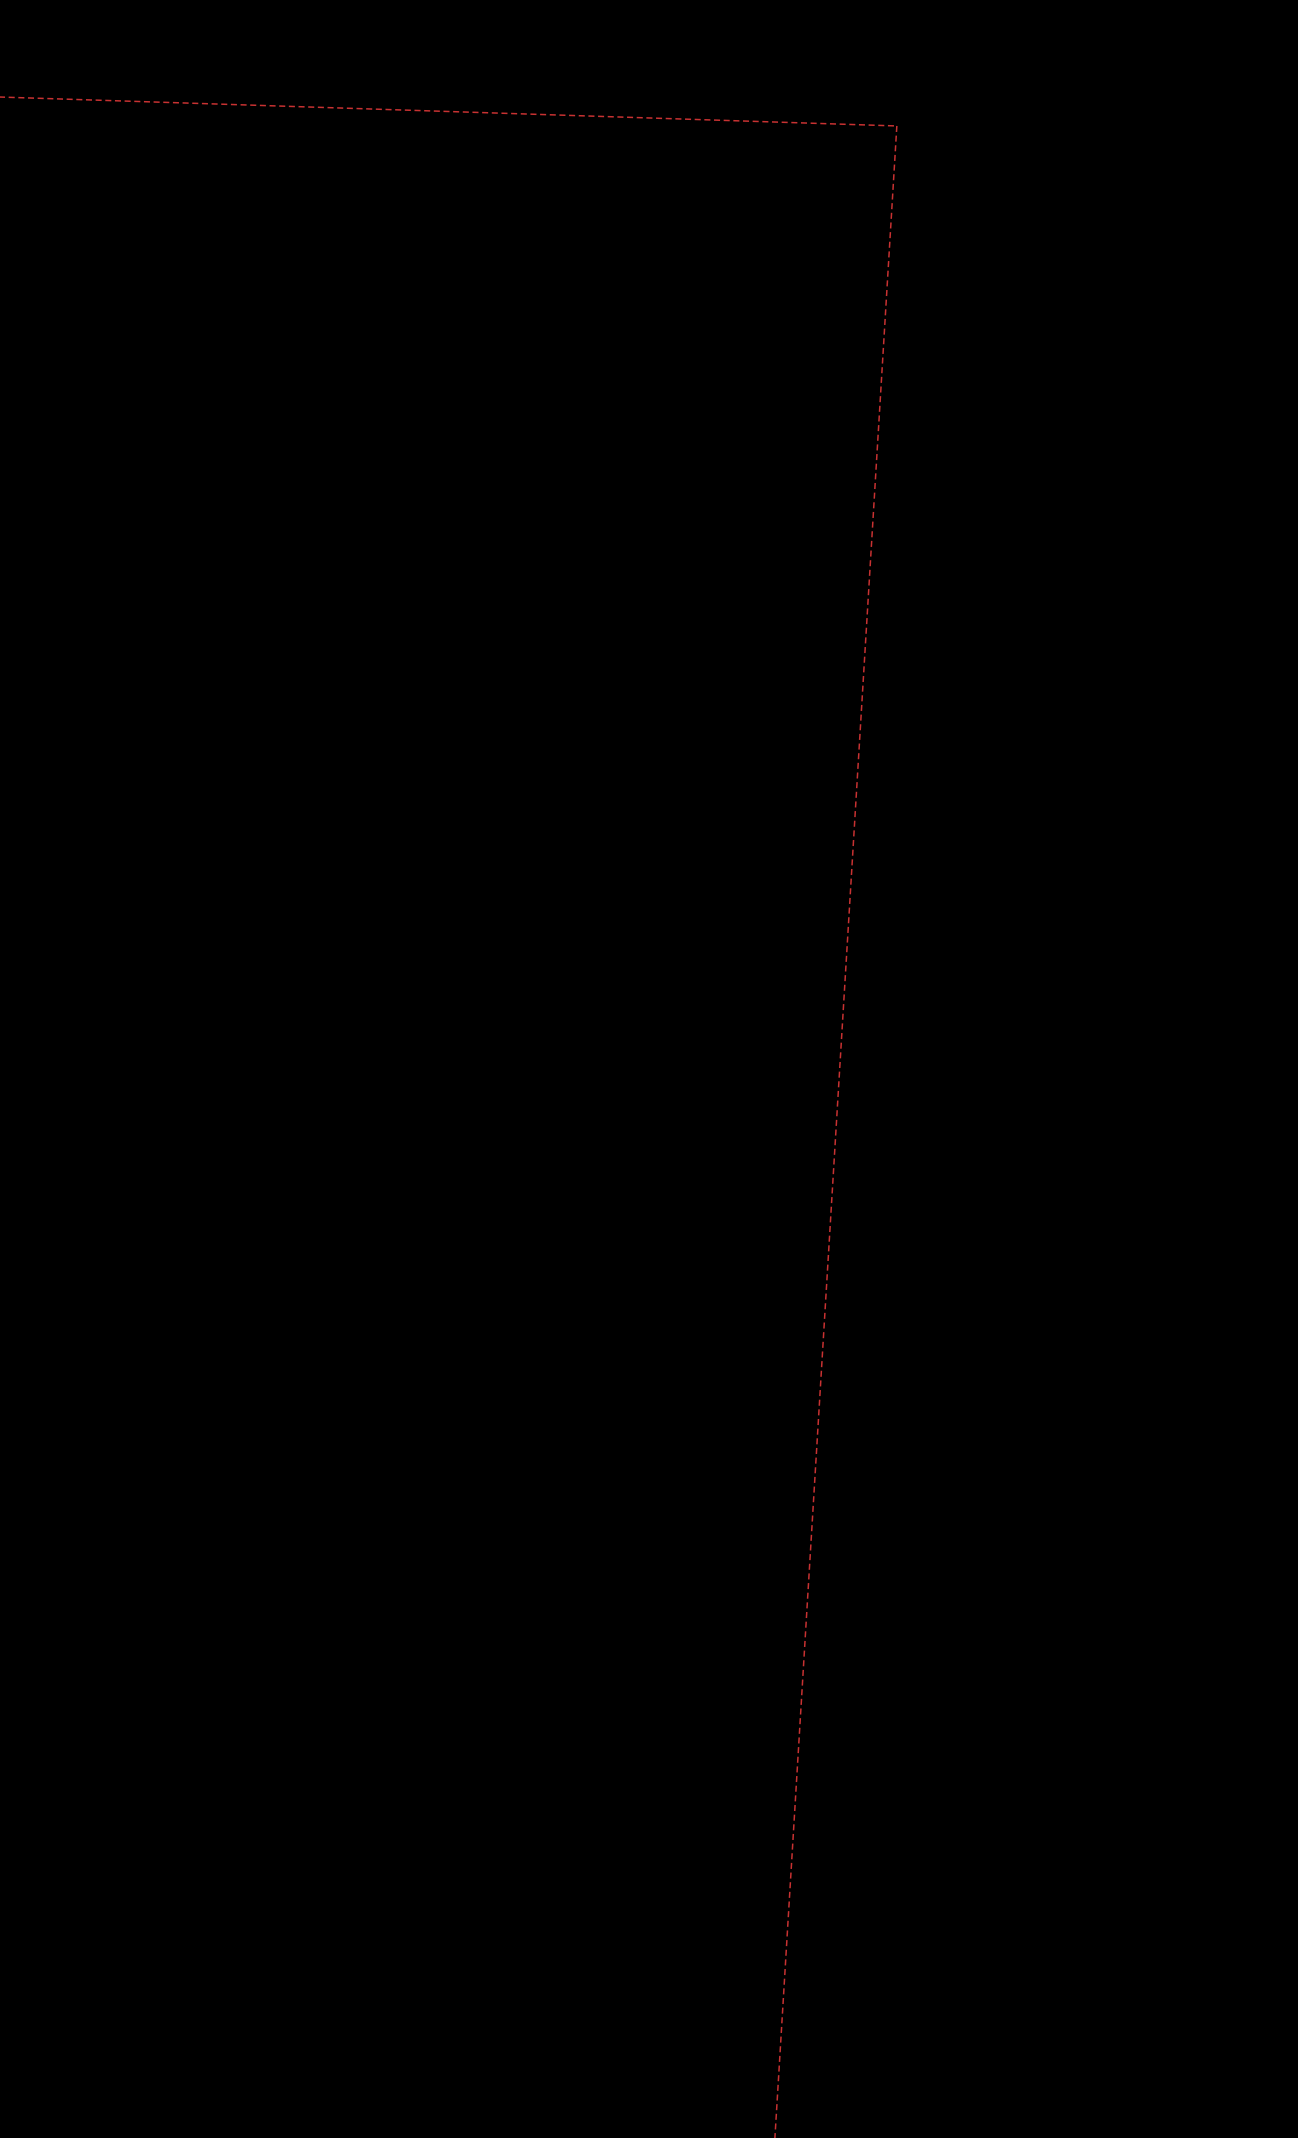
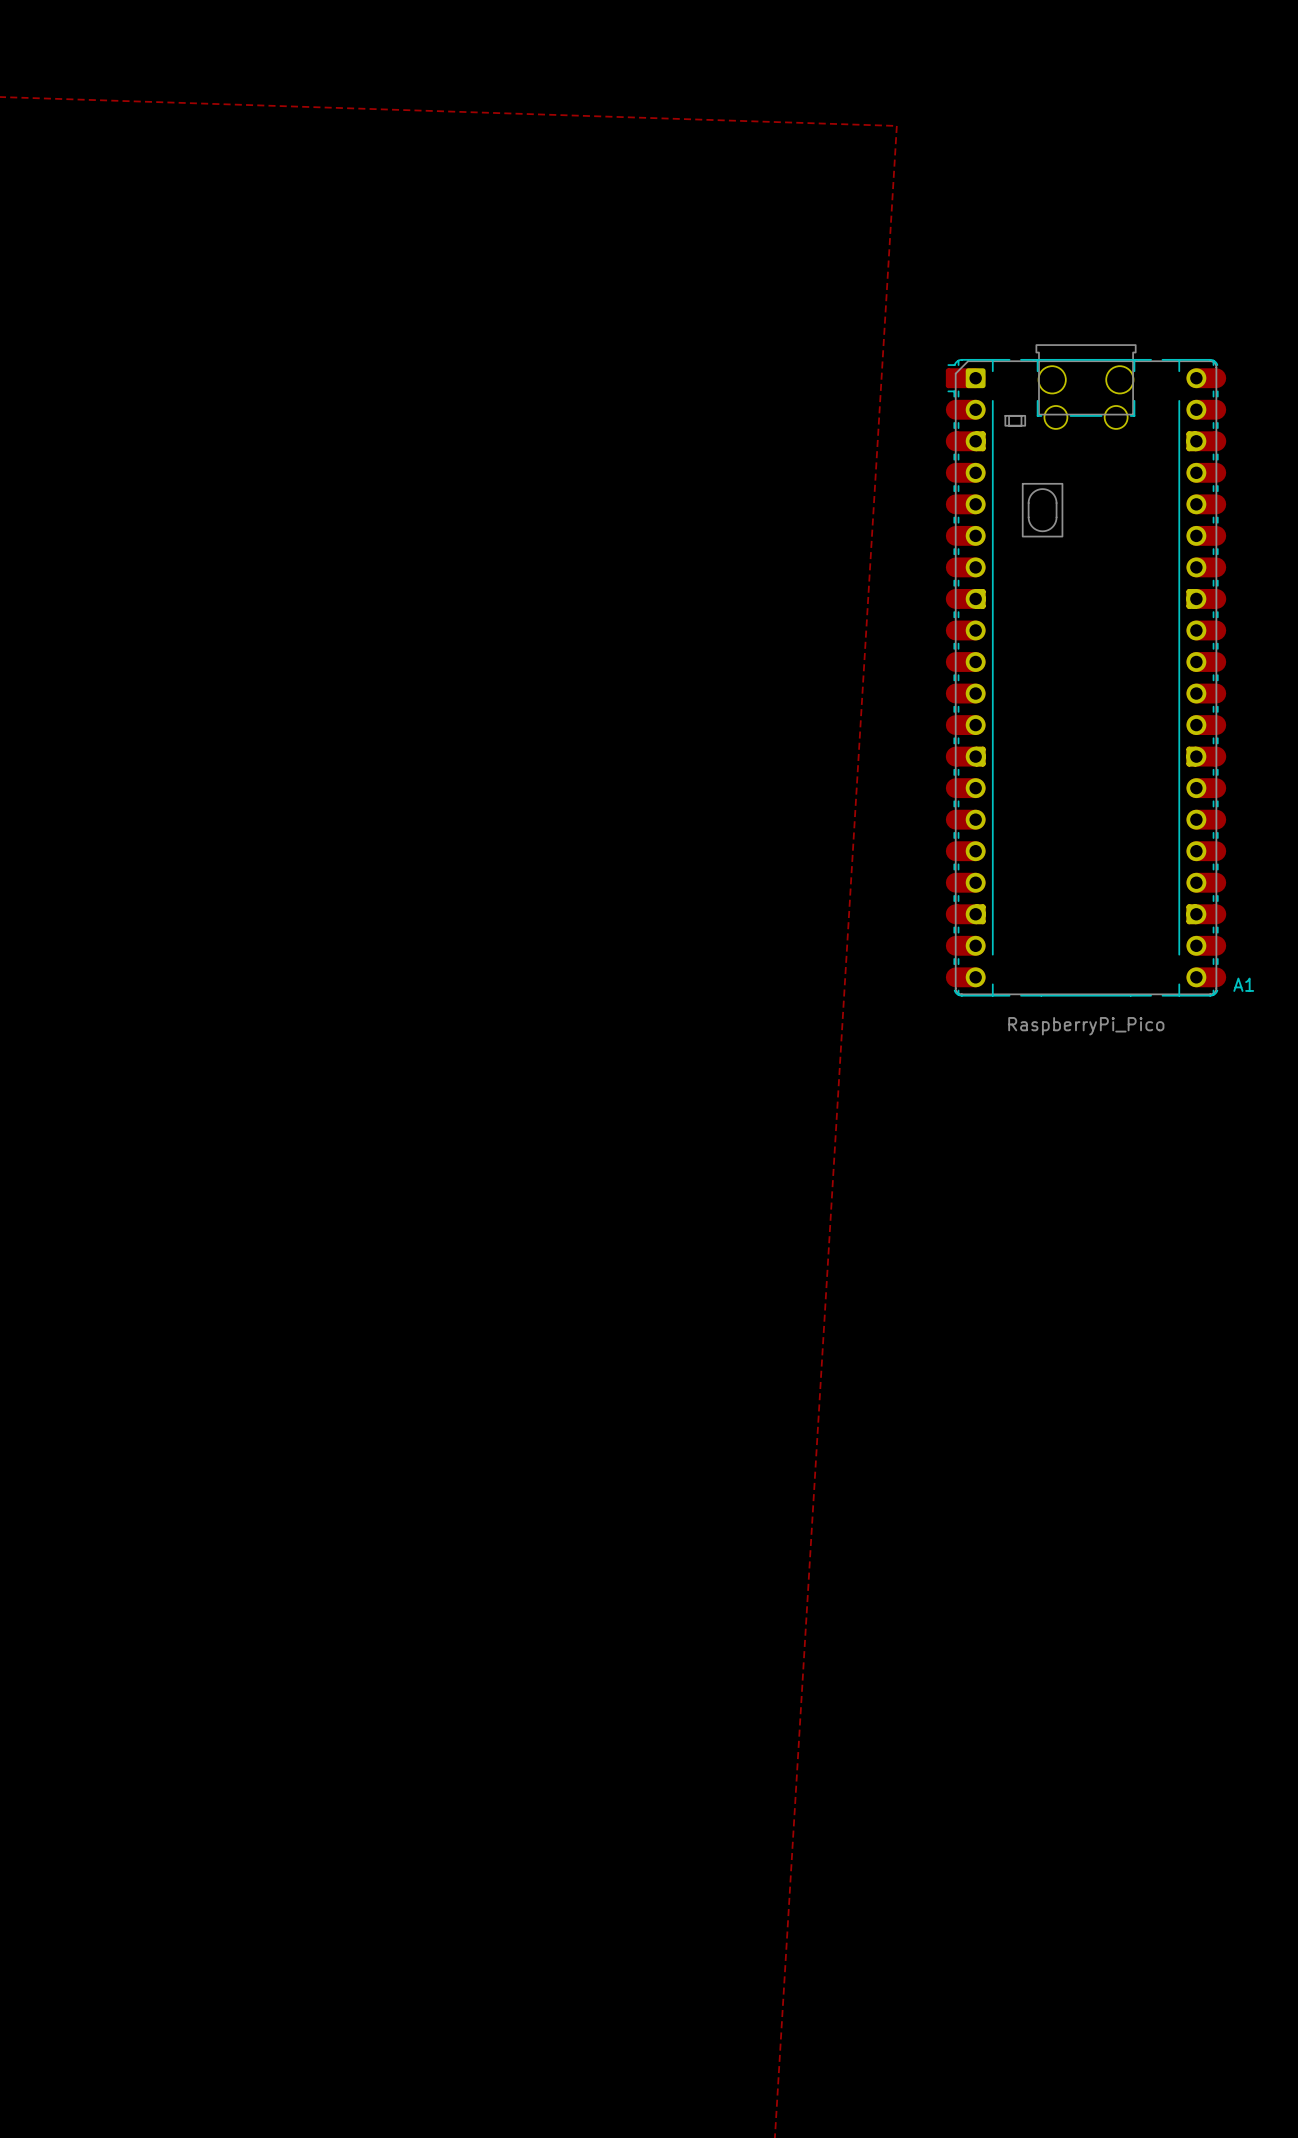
A1: none -> RaspberryPi_Pico (1086, 670)

